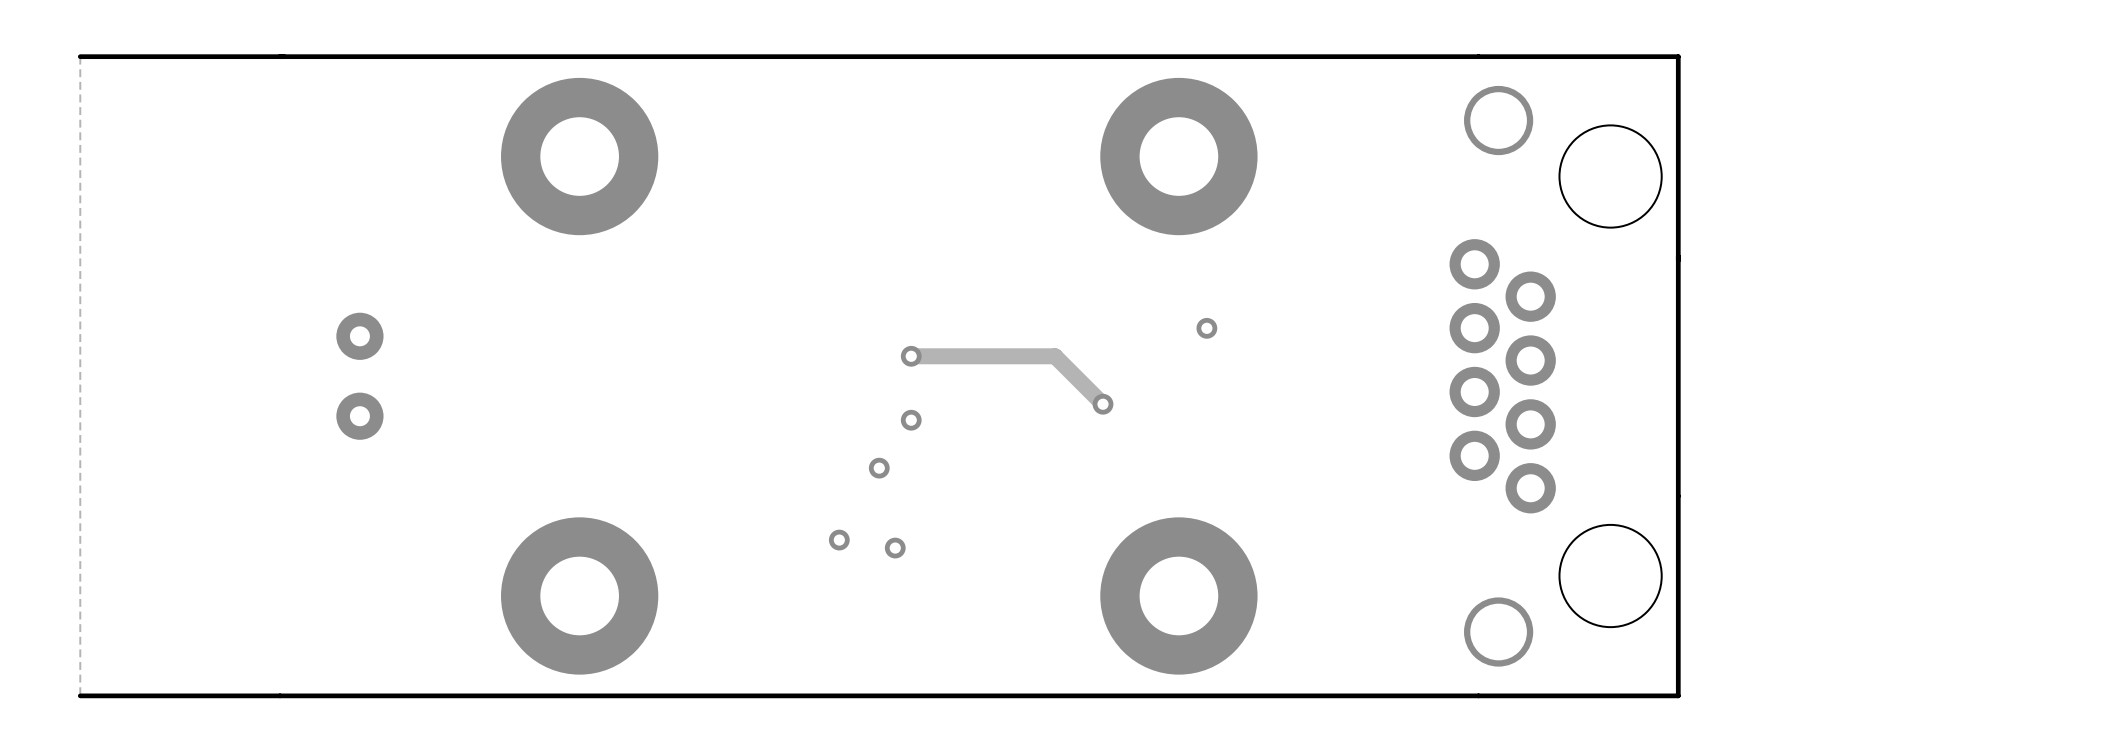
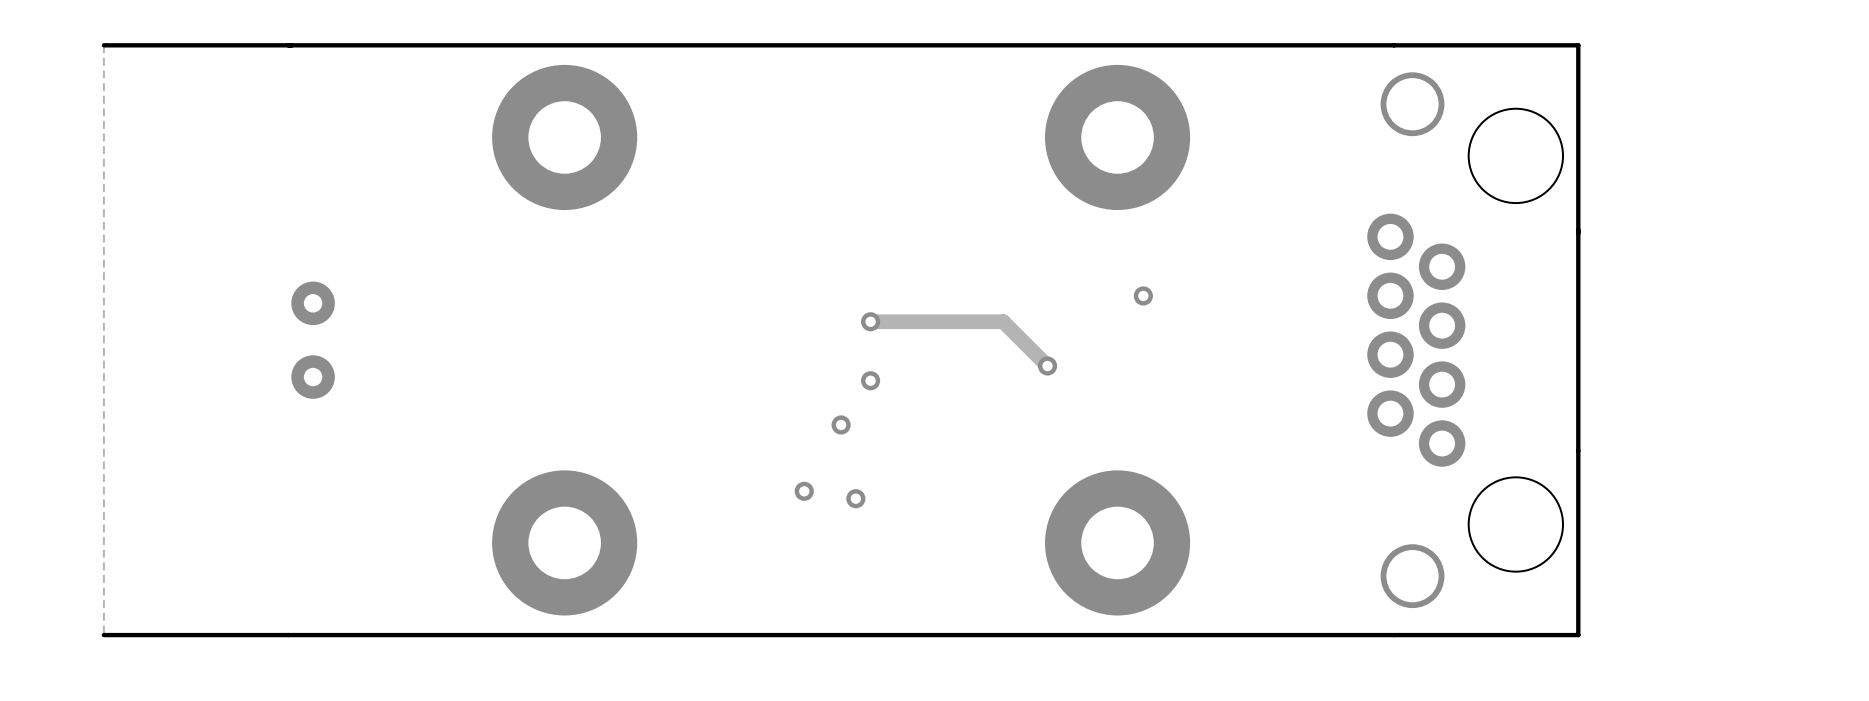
part position: (359, 376) -> (313, 340)

